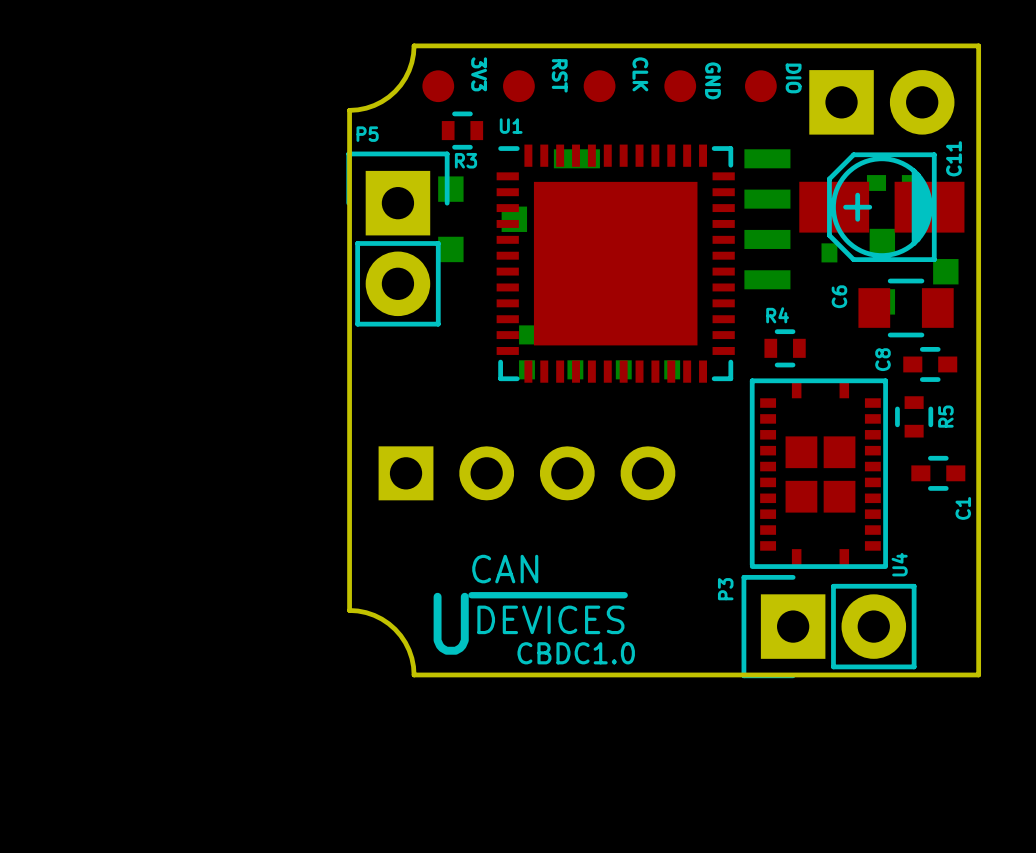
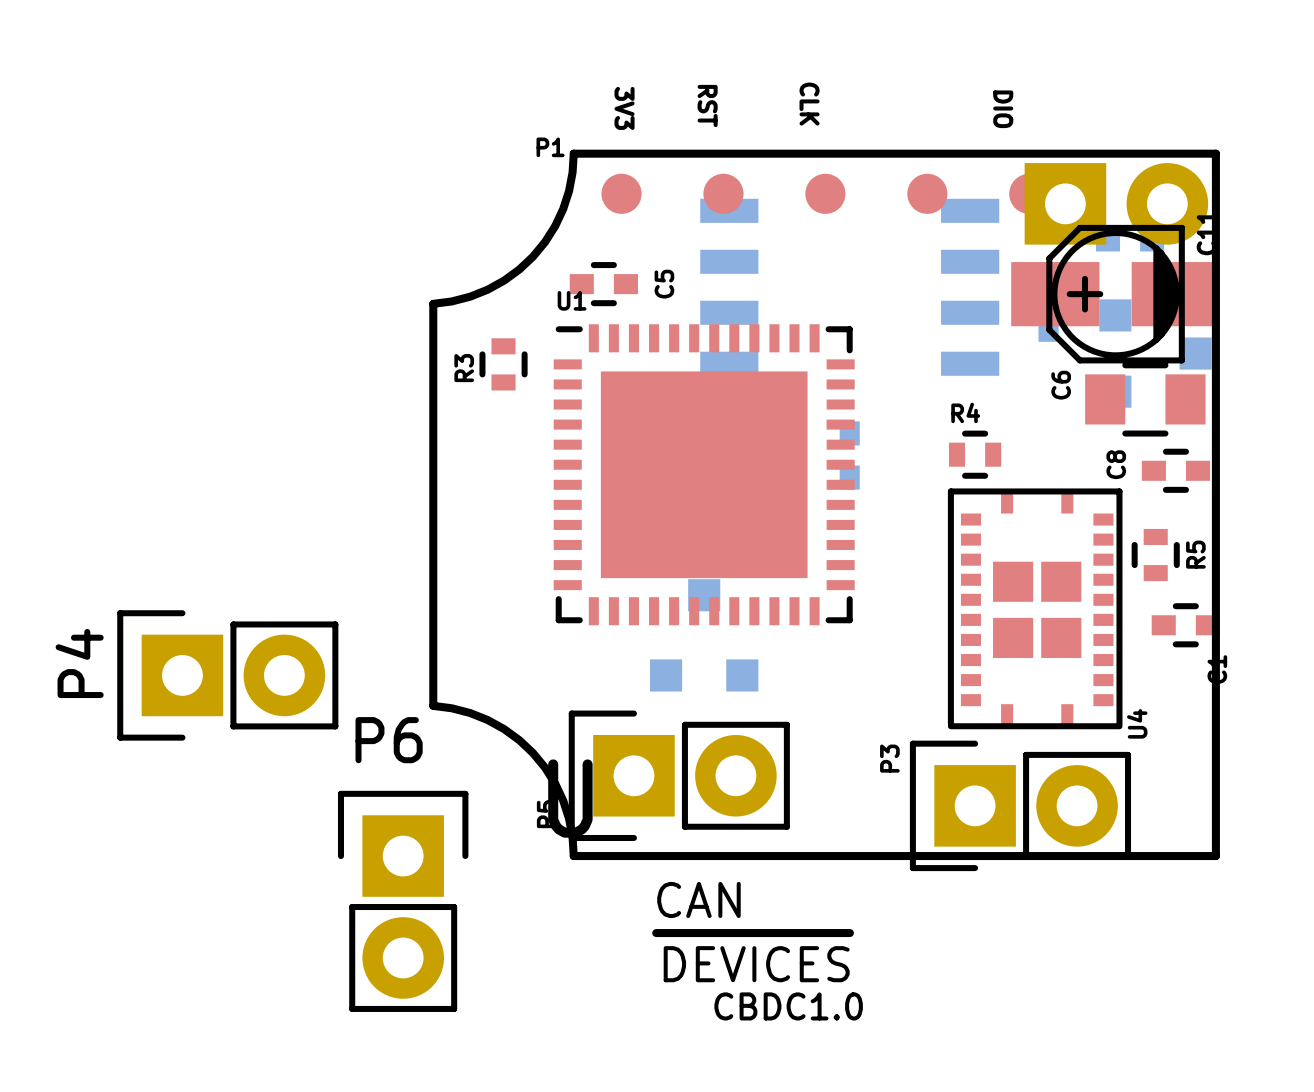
board edge: (414, 45) (978, 45) (978, 674) (414, 674) (409, 650) (395, 629) (374, 615) (349, 610) (349, 110) (374, 105) (395, 91) (409, 70) (414, 45) -> none
text position: 3V3 (479, 74) -> 3V3 (624, 108)
text: GND (712, 80) -> none
part: (599, 86) -> none
part position: (881, 102) -> (1116, 203)
R3 rotation: 0° (462, 130) -> 90° clockwise (503, 364)
R3 position: (462, 130) -> (503, 364)
P1: none -> (825, 193)
C11 position: (881, 207) -> (1115, 294)
part rotation: 0° (482, 219) -> 90° counterclockwise (704, 635)
part position: (482, 219) -> (704, 635)
board edge: none -> (433, 303) (451, 301) (487, 289) (504, 280) (533, 256) (555, 226) (563, 208) (572, 172) (573, 153) (1215, 153) (1215, 856) (573, 856) (572, 837) (563, 800) (555, 783) (533, 753) (504, 729) (487, 720) (451, 708) (433, 705)
board edge: none -> (433, 304) (433, 705)
P5 rotation: 0° (397, 239) -> 90° counterclockwise (679, 775)
P5 position: (397, 239) -> (679, 775)
U1 position: (615, 263) -> (704, 474)
R4 position: (785, 348) -> (975, 454)
C5 side: bottom (526, 352) -> top (603, 284)
R5 position: (914, 416) -> (1155, 555)
part: (526, 473) -> none
C1 position: (938, 473) -> (1185, 625)
P4: none -> (227, 675)
text position: CAN (505, 569) -> CAN (698, 899)
line: (471, 595) (624, 595) -> (656, 933) (849, 933)
text position: DEVICES (550, 619) -> DEVICES (756, 964)
P3 position: (829, 626) -> (1020, 805)
text position: CBDC1.0 (576, 653) -> CBDC1.0 (788, 1006)
P6: none -> (403, 901)

